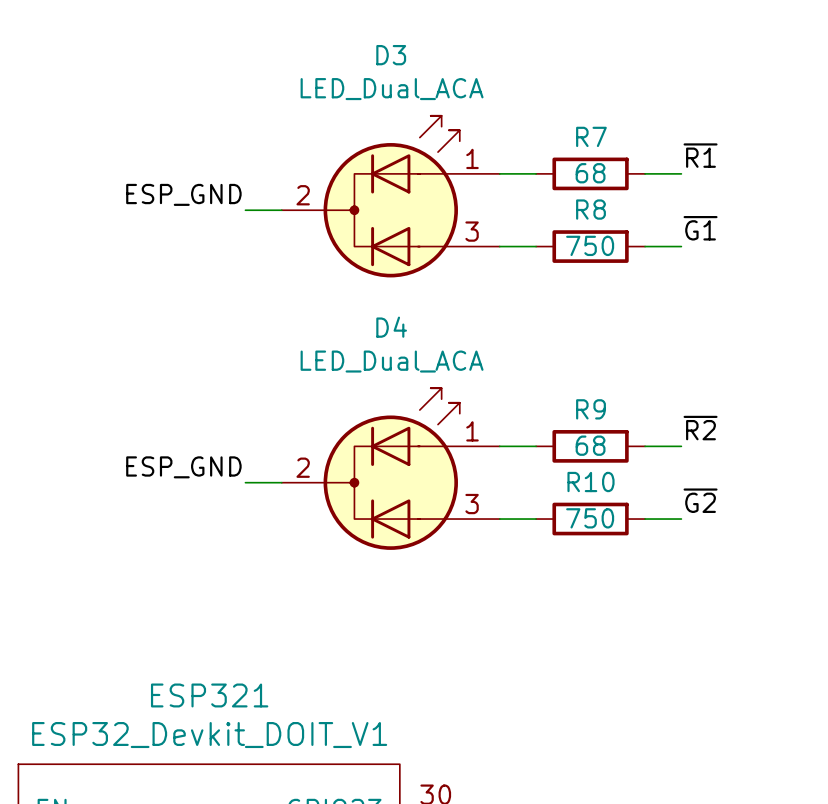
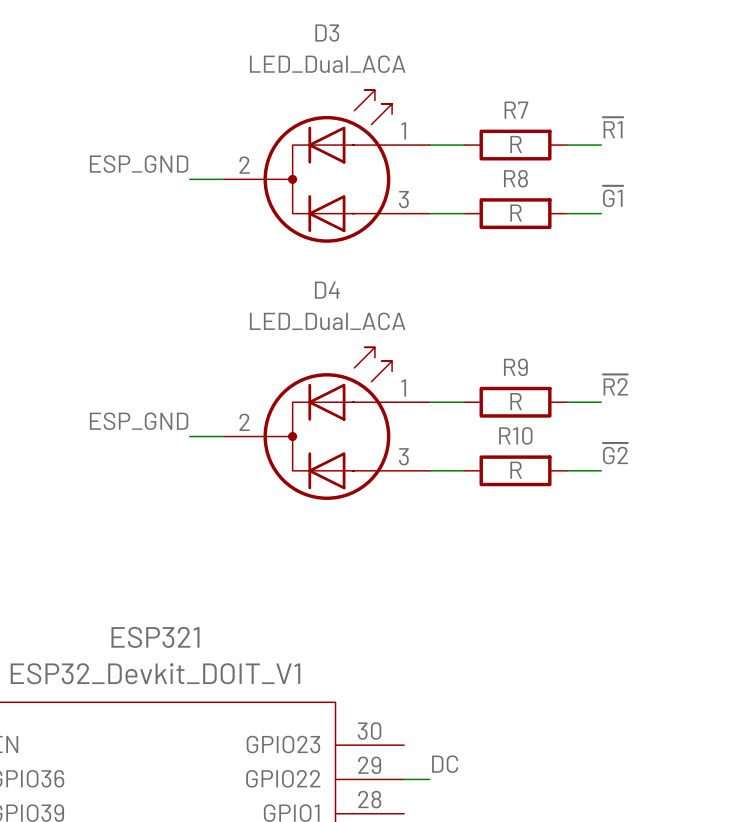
R7 value: 68 (590, 173) -> R (516, 144)
R8 value: 750 (590, 245) -> R (516, 213)
R9 value: 68 (590, 445) -> R (516, 401)
R10 value: 750 (590, 518) -> R (516, 470)

